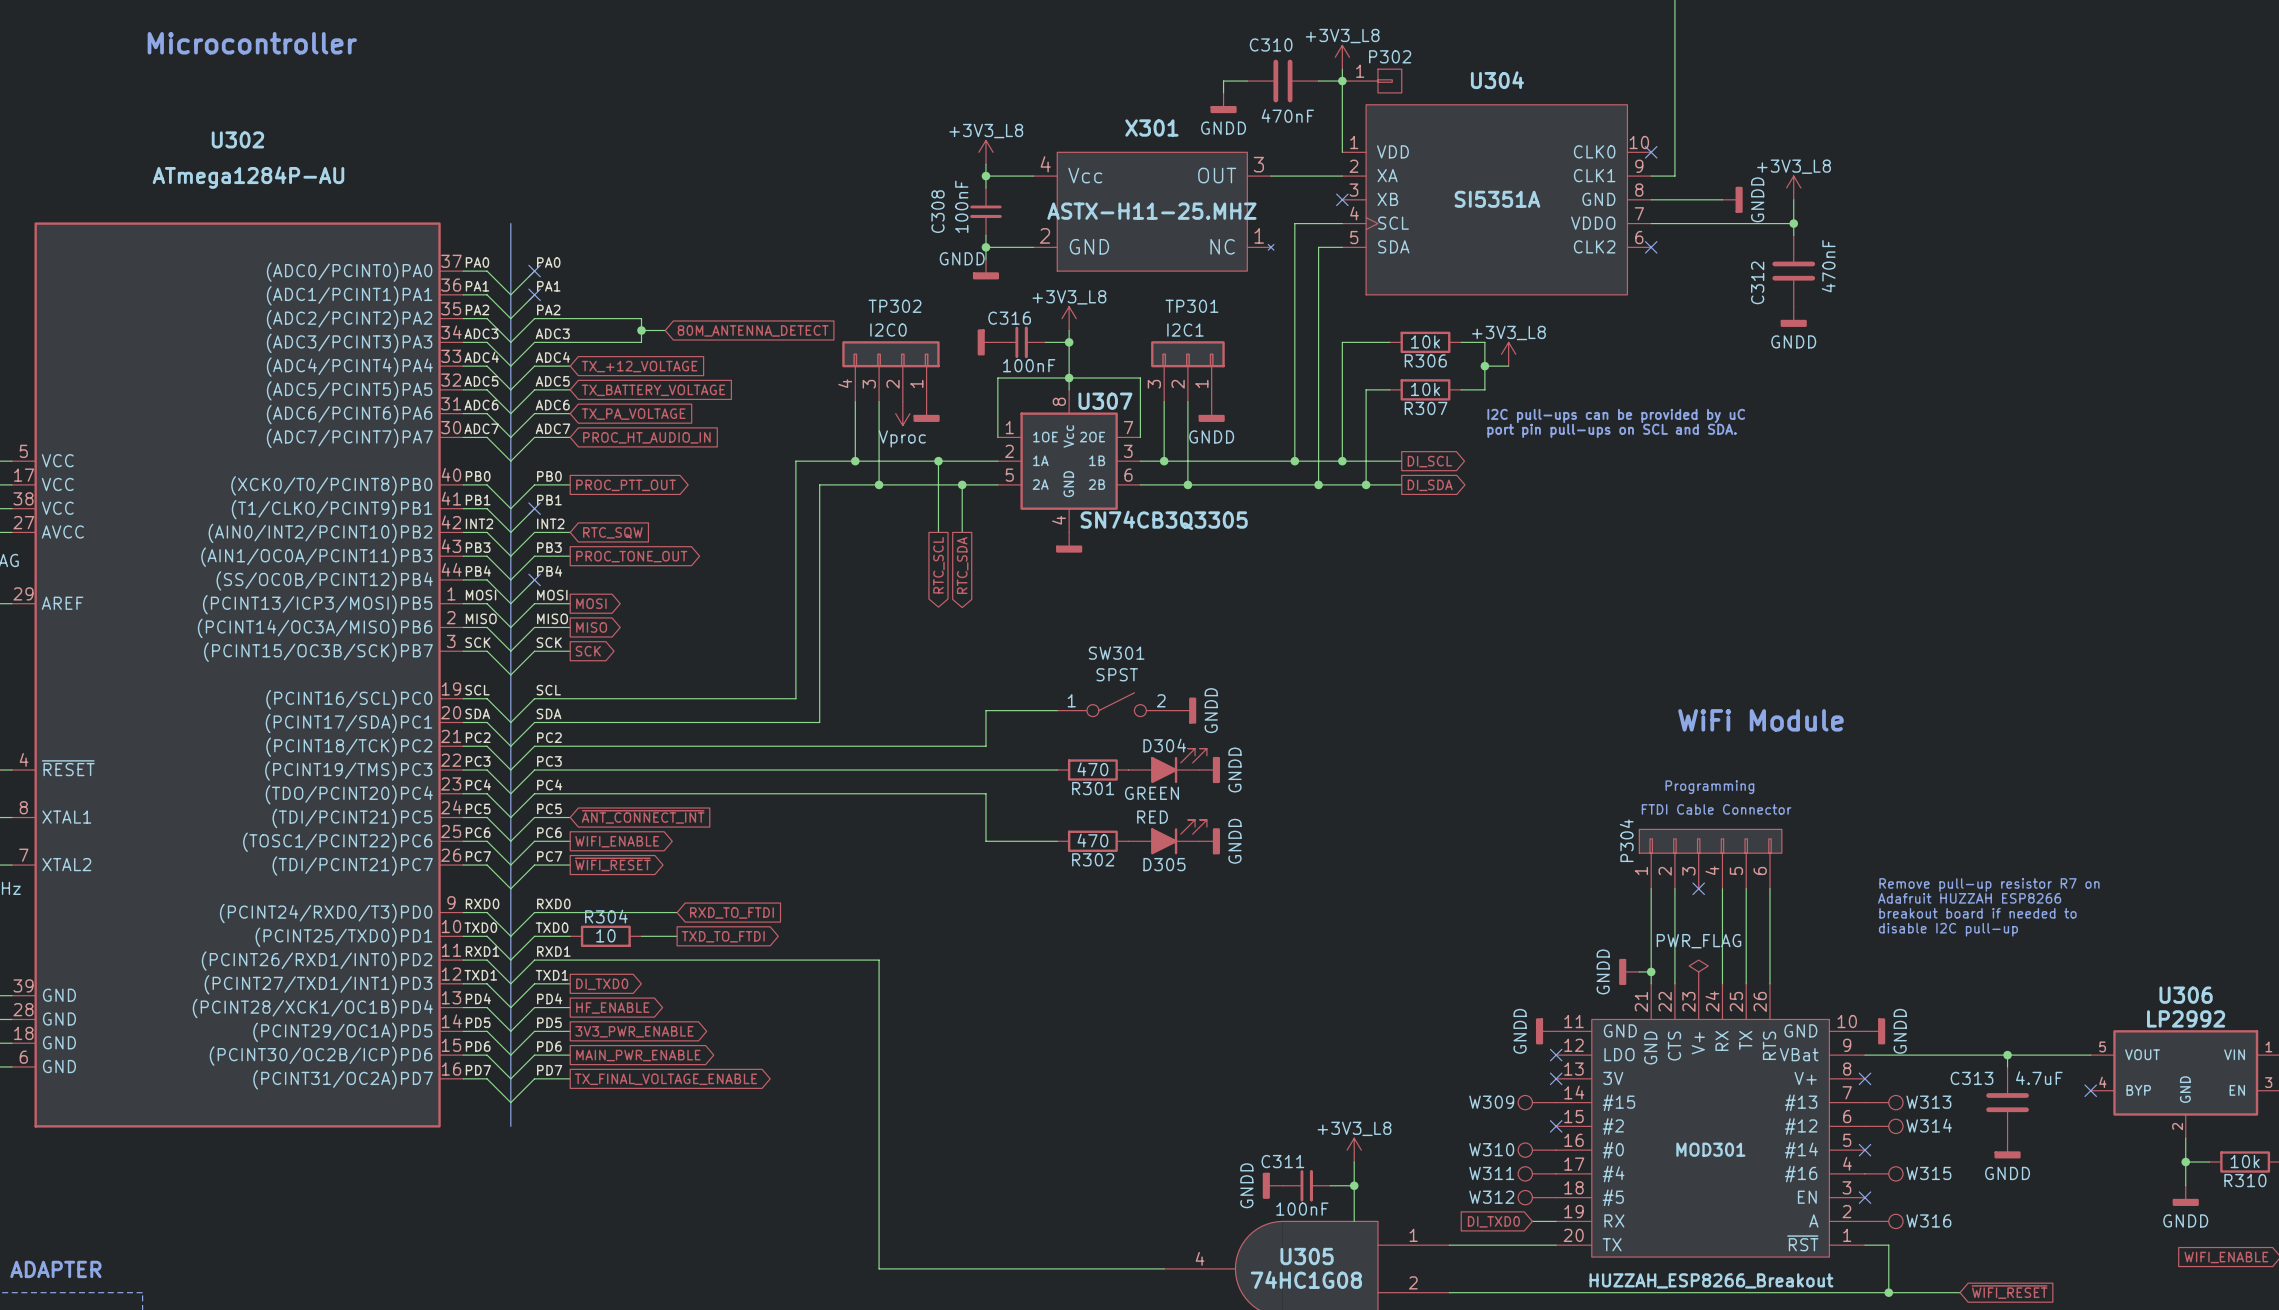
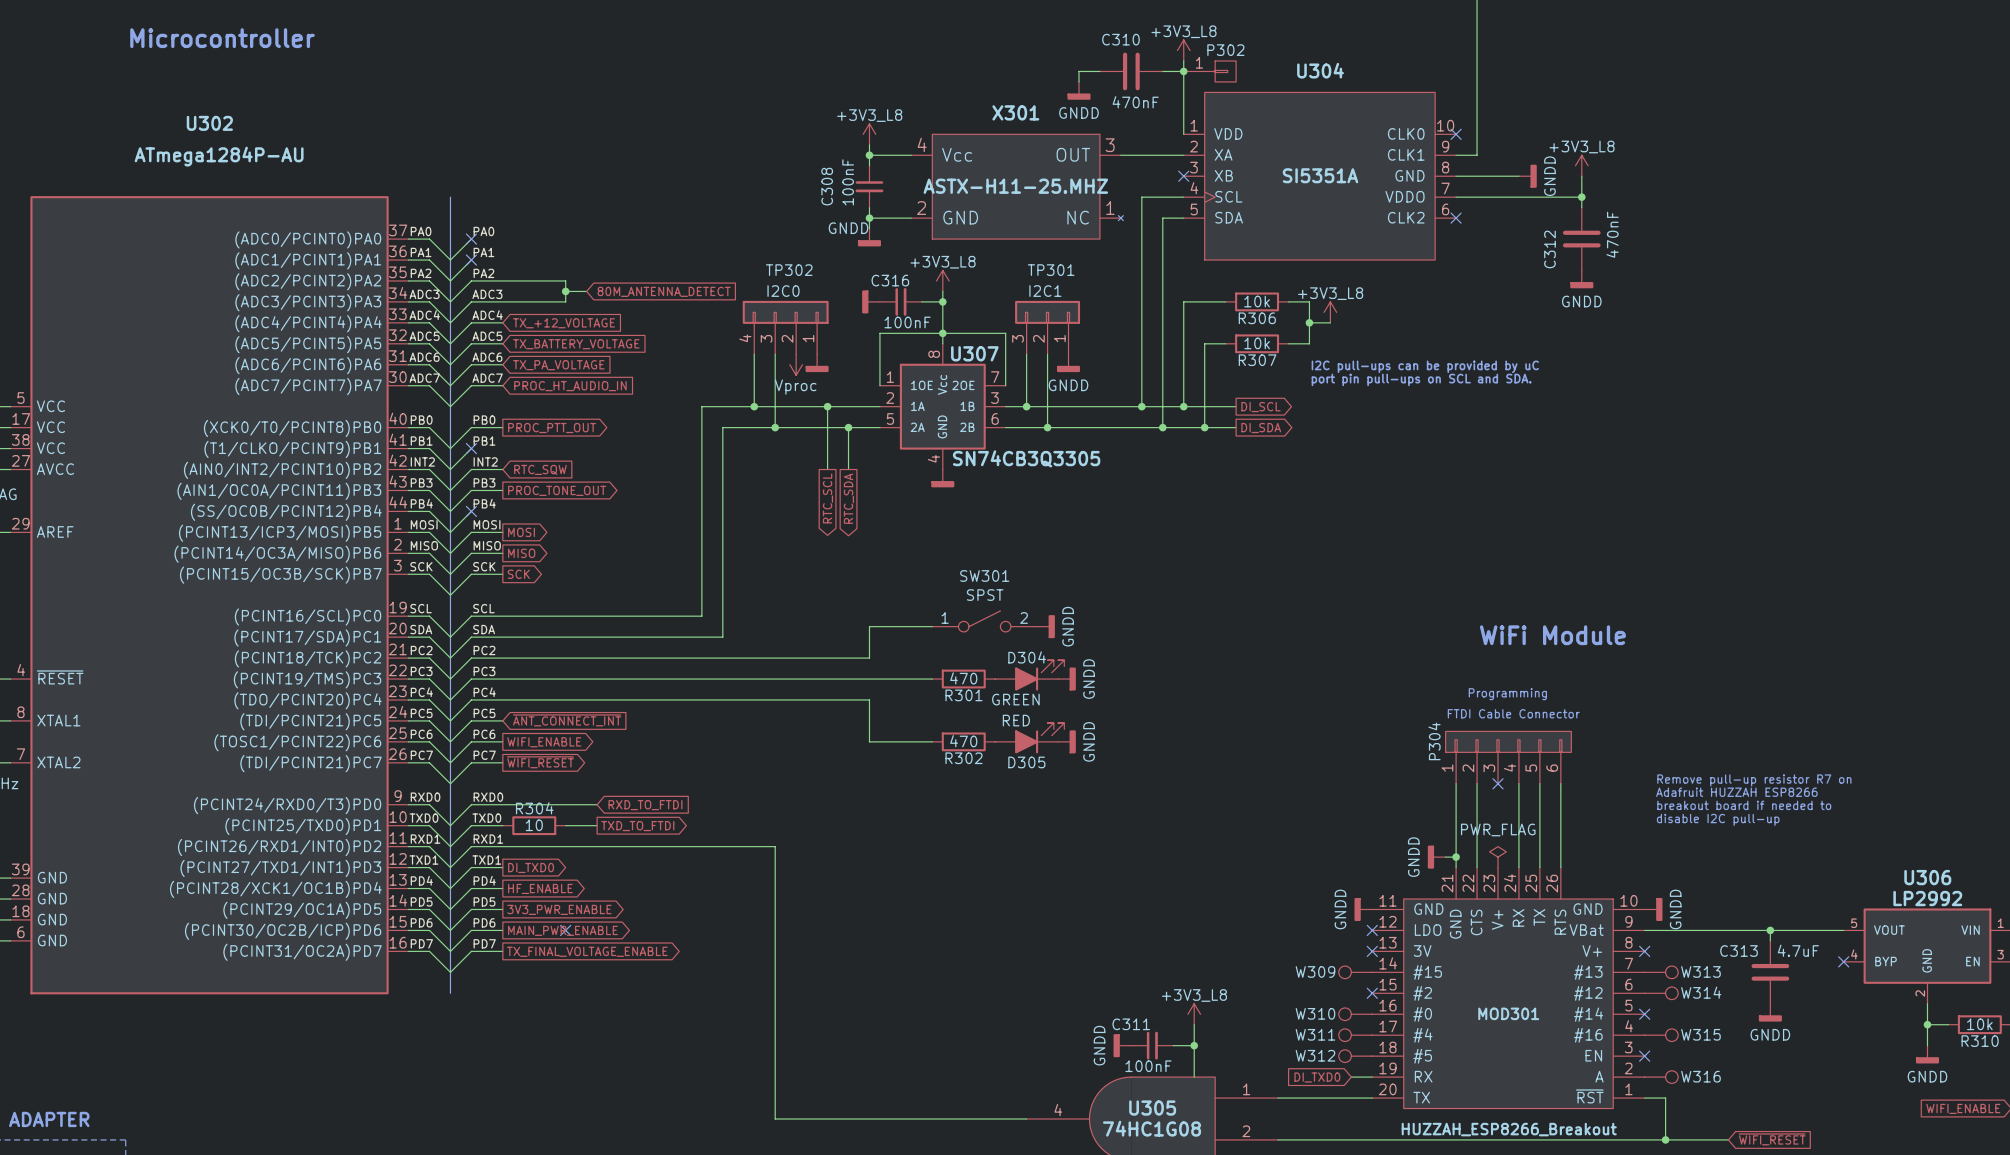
no-connect mark: none -> (565, 930)

